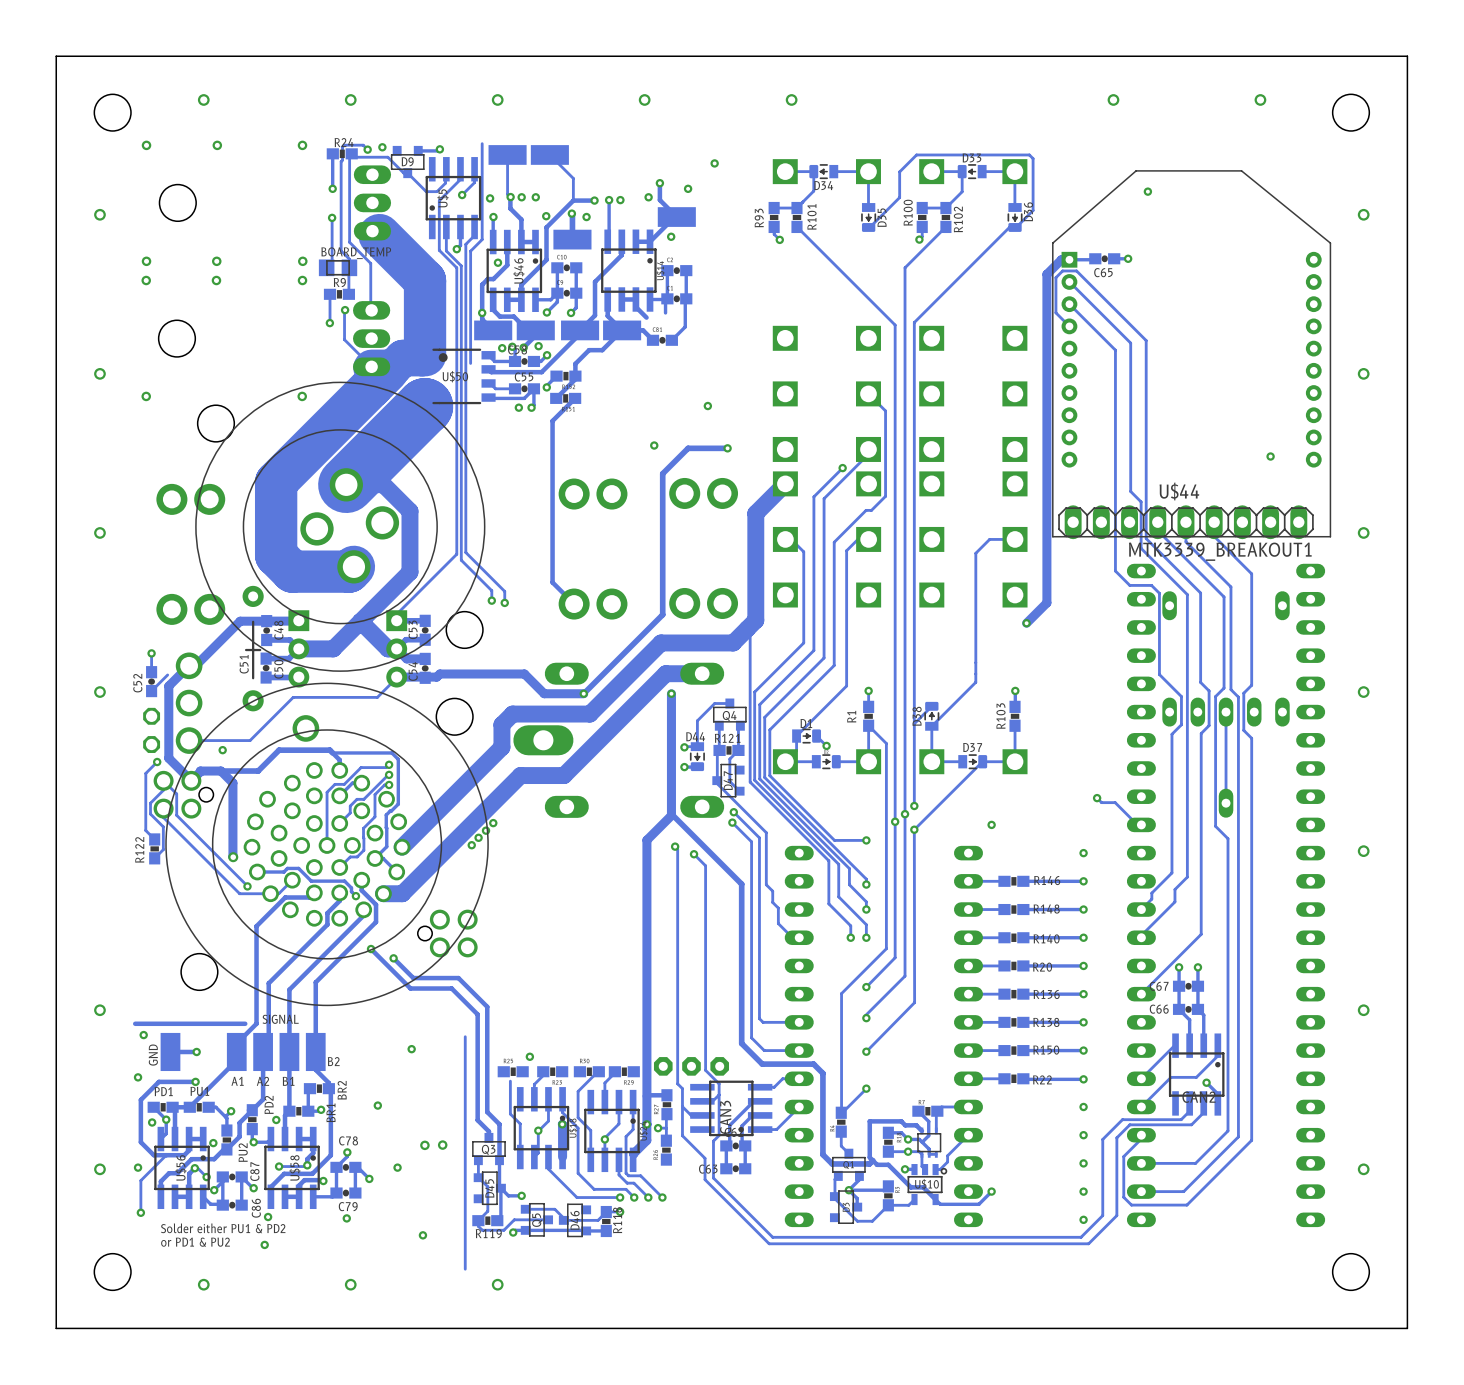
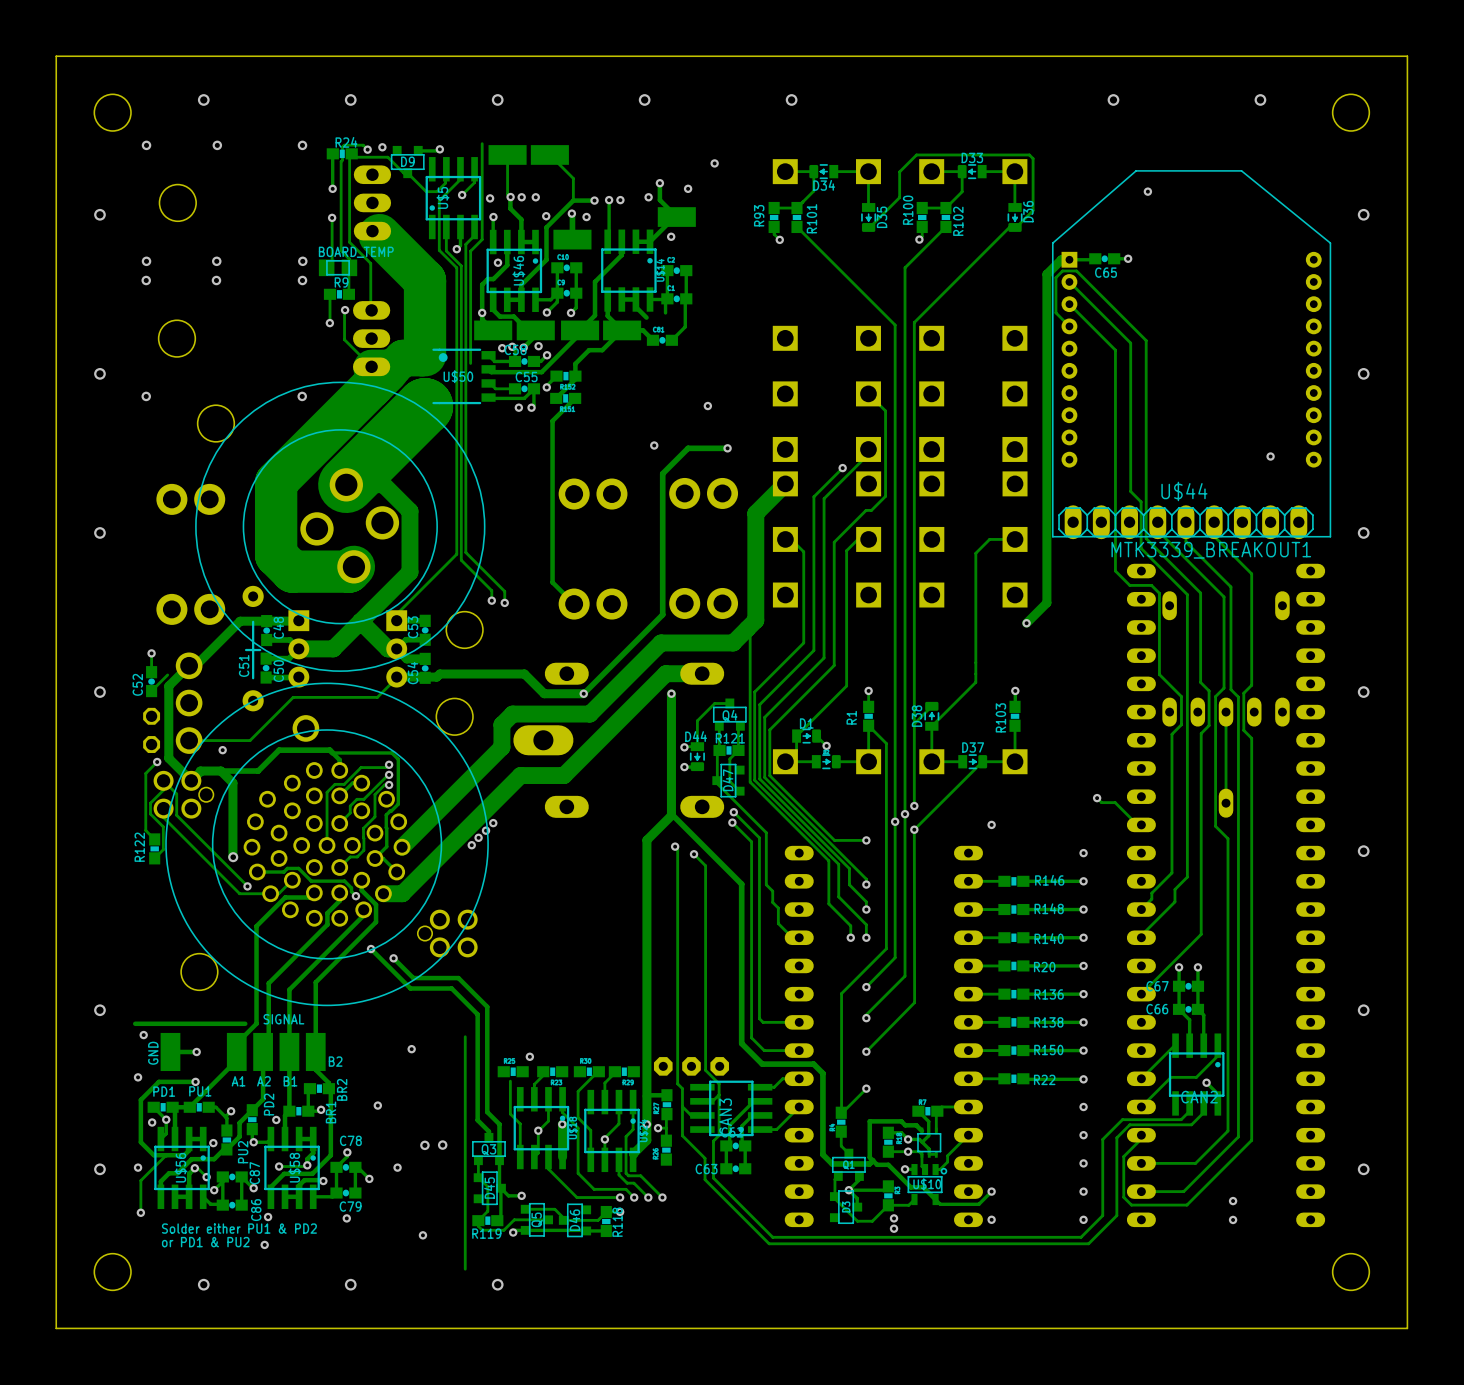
via: none -> (1233, 1201)
via: none -> (894, 1218)
via: none -> (991, 1219)
via: none -> (1233, 1219)
via: none -> (894, 1228)

